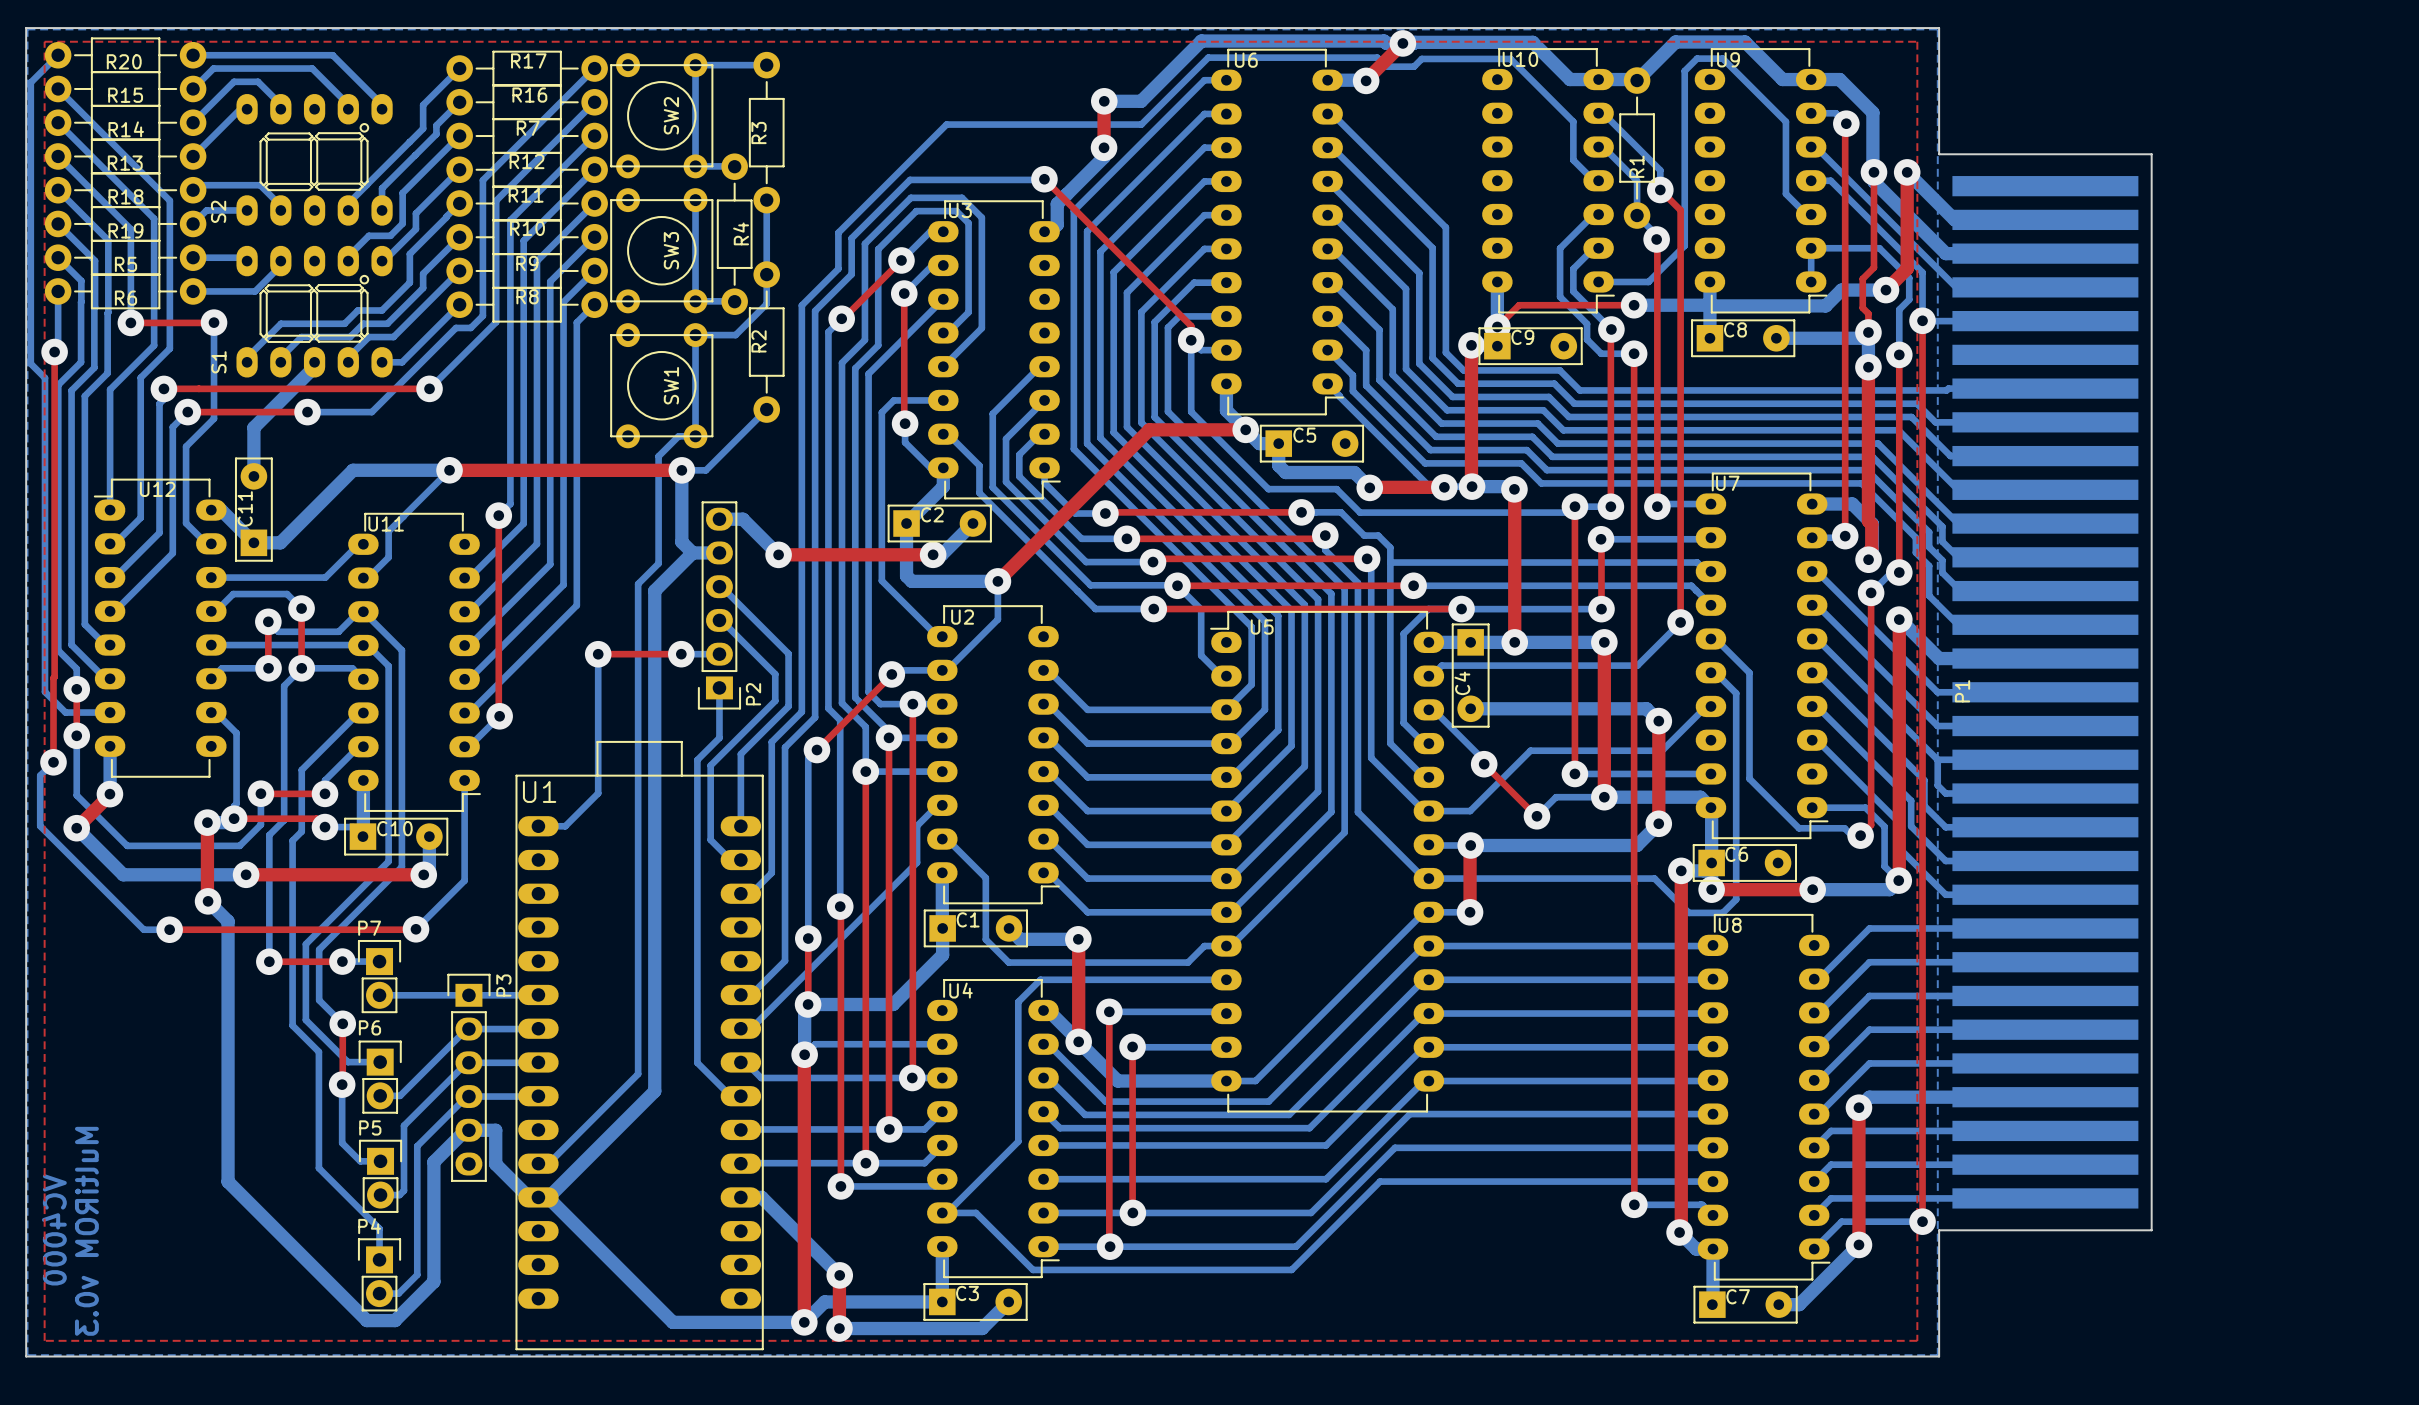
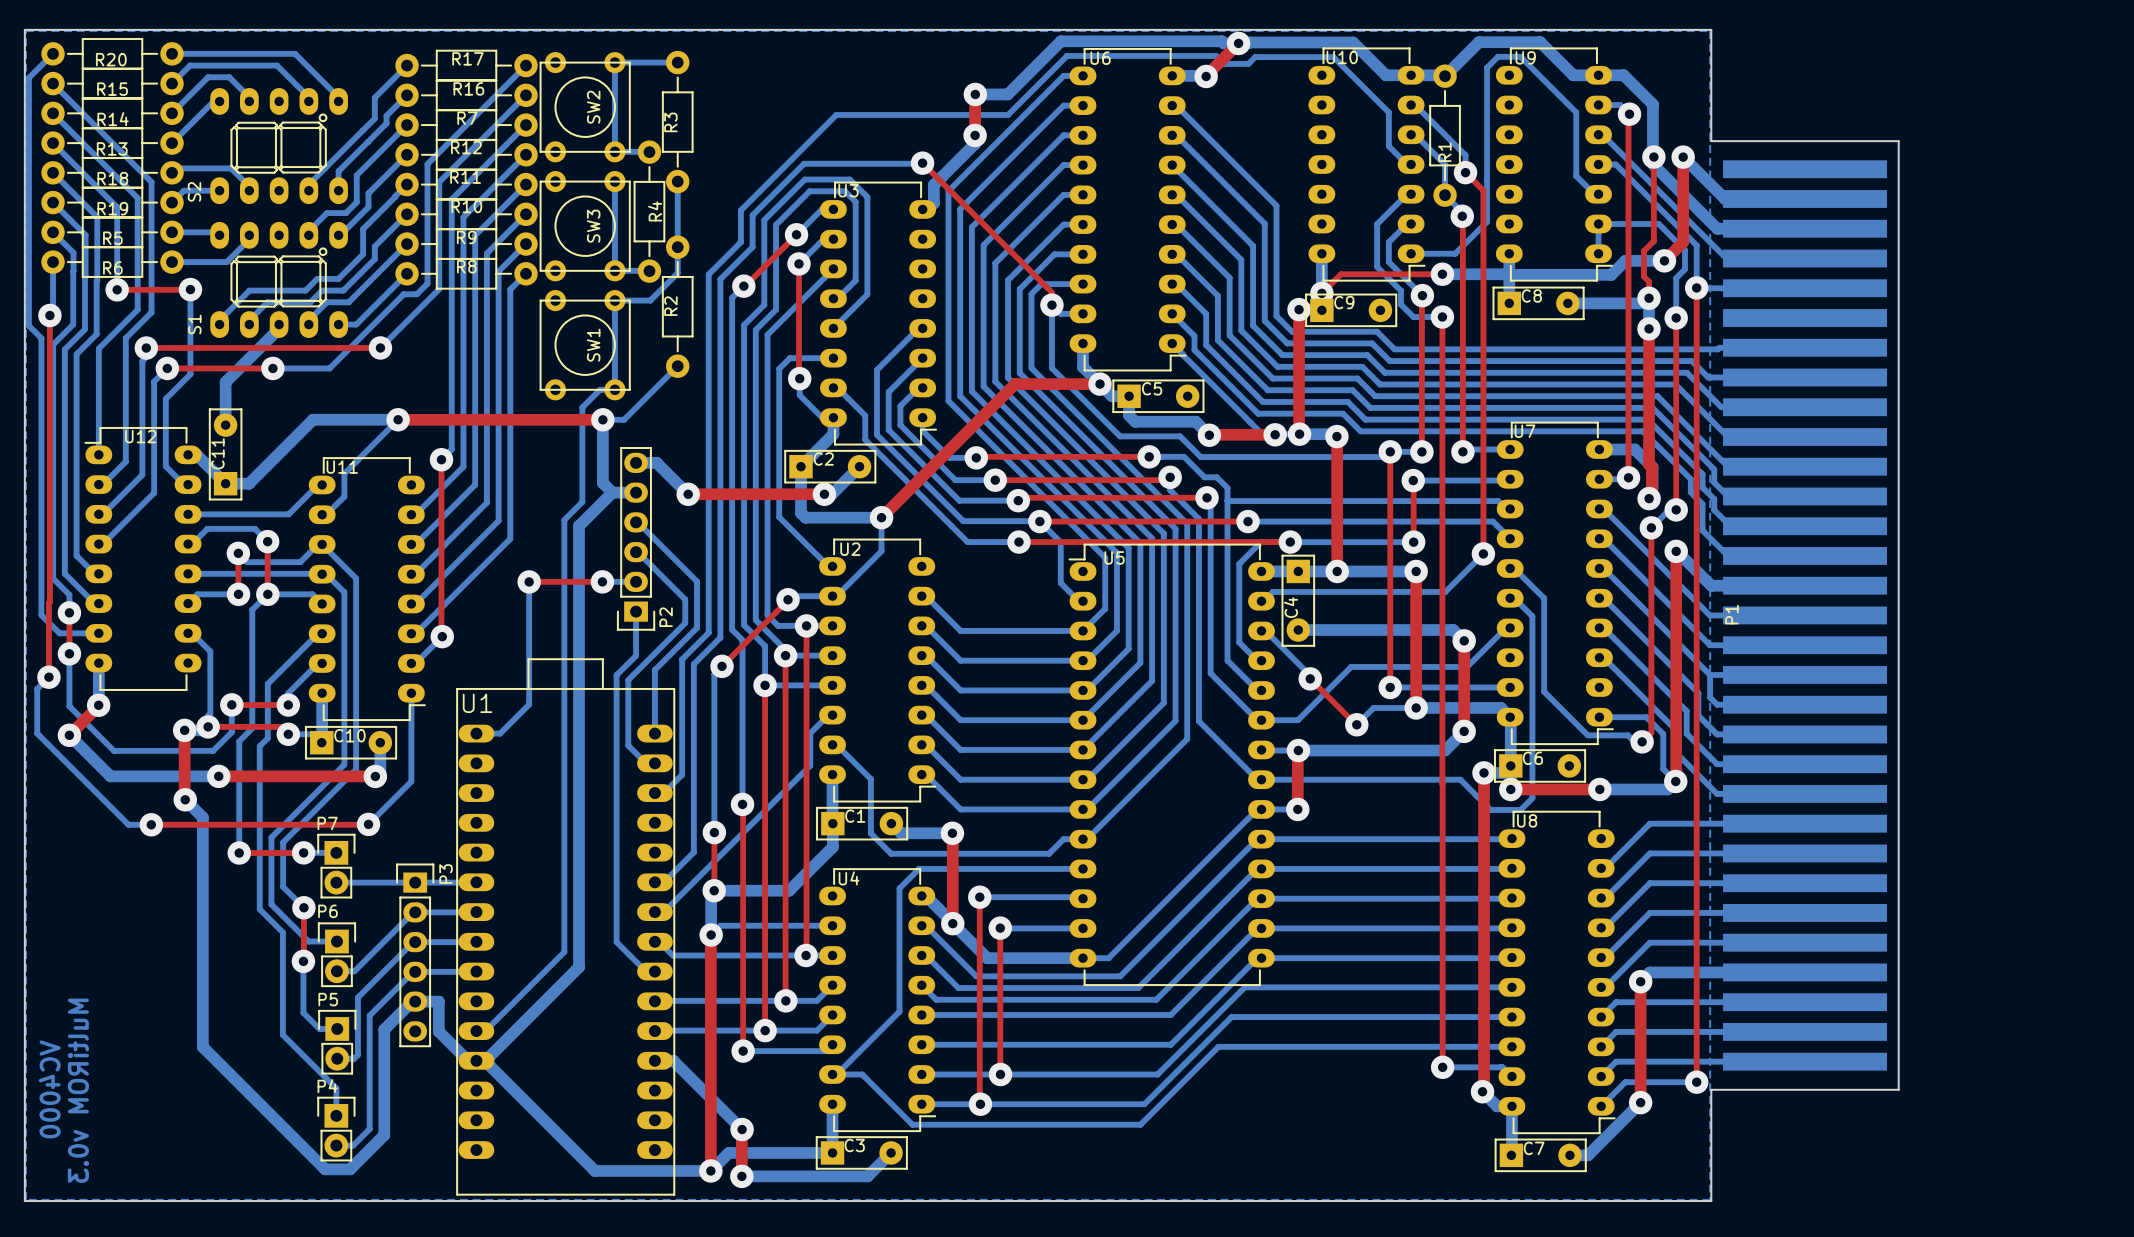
top zone outline: (44, 41) (1917, 41) (1917, 1340) (44, 1340) (44, 41) -> none

